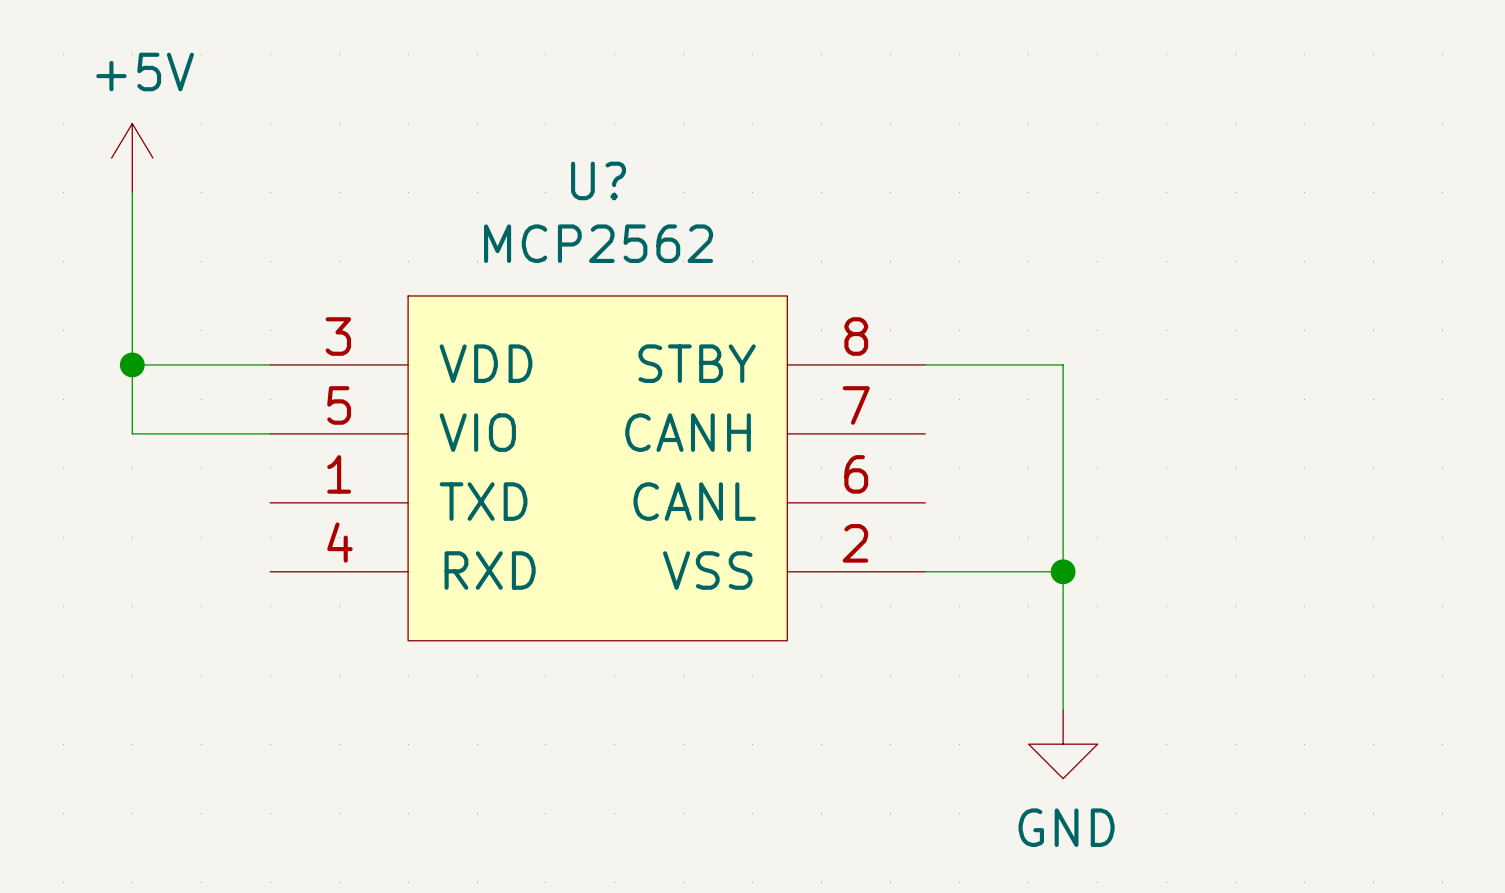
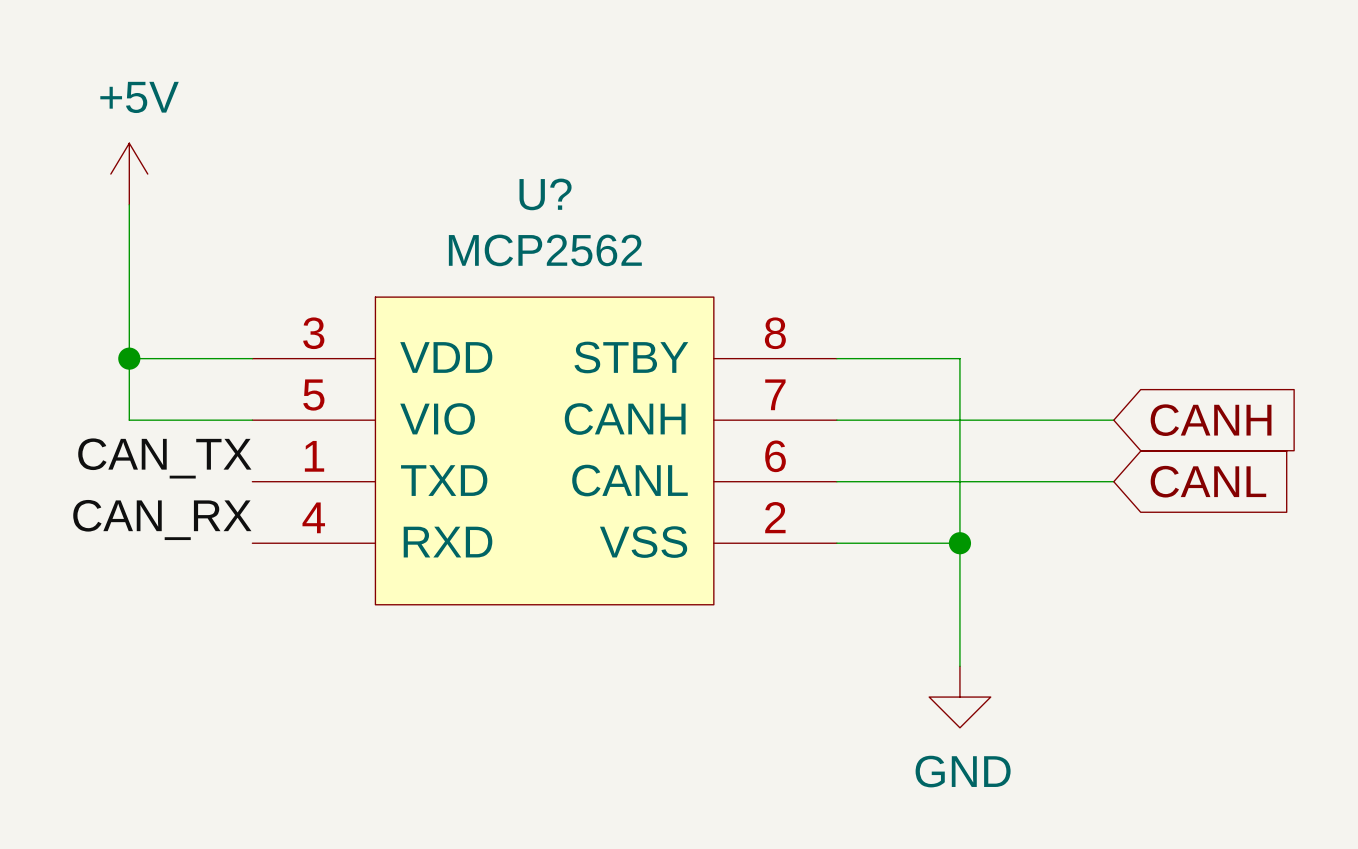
wire: none -> (836, 420) (1113, 420)
global label: none -> CANH (1211, 420)
label: none -> CAN_TX (164, 458)
wire: none -> (836, 481) (1113, 481)
global label: none -> CANL (1208, 481)
label: none -> CAN_RX (162, 519)

